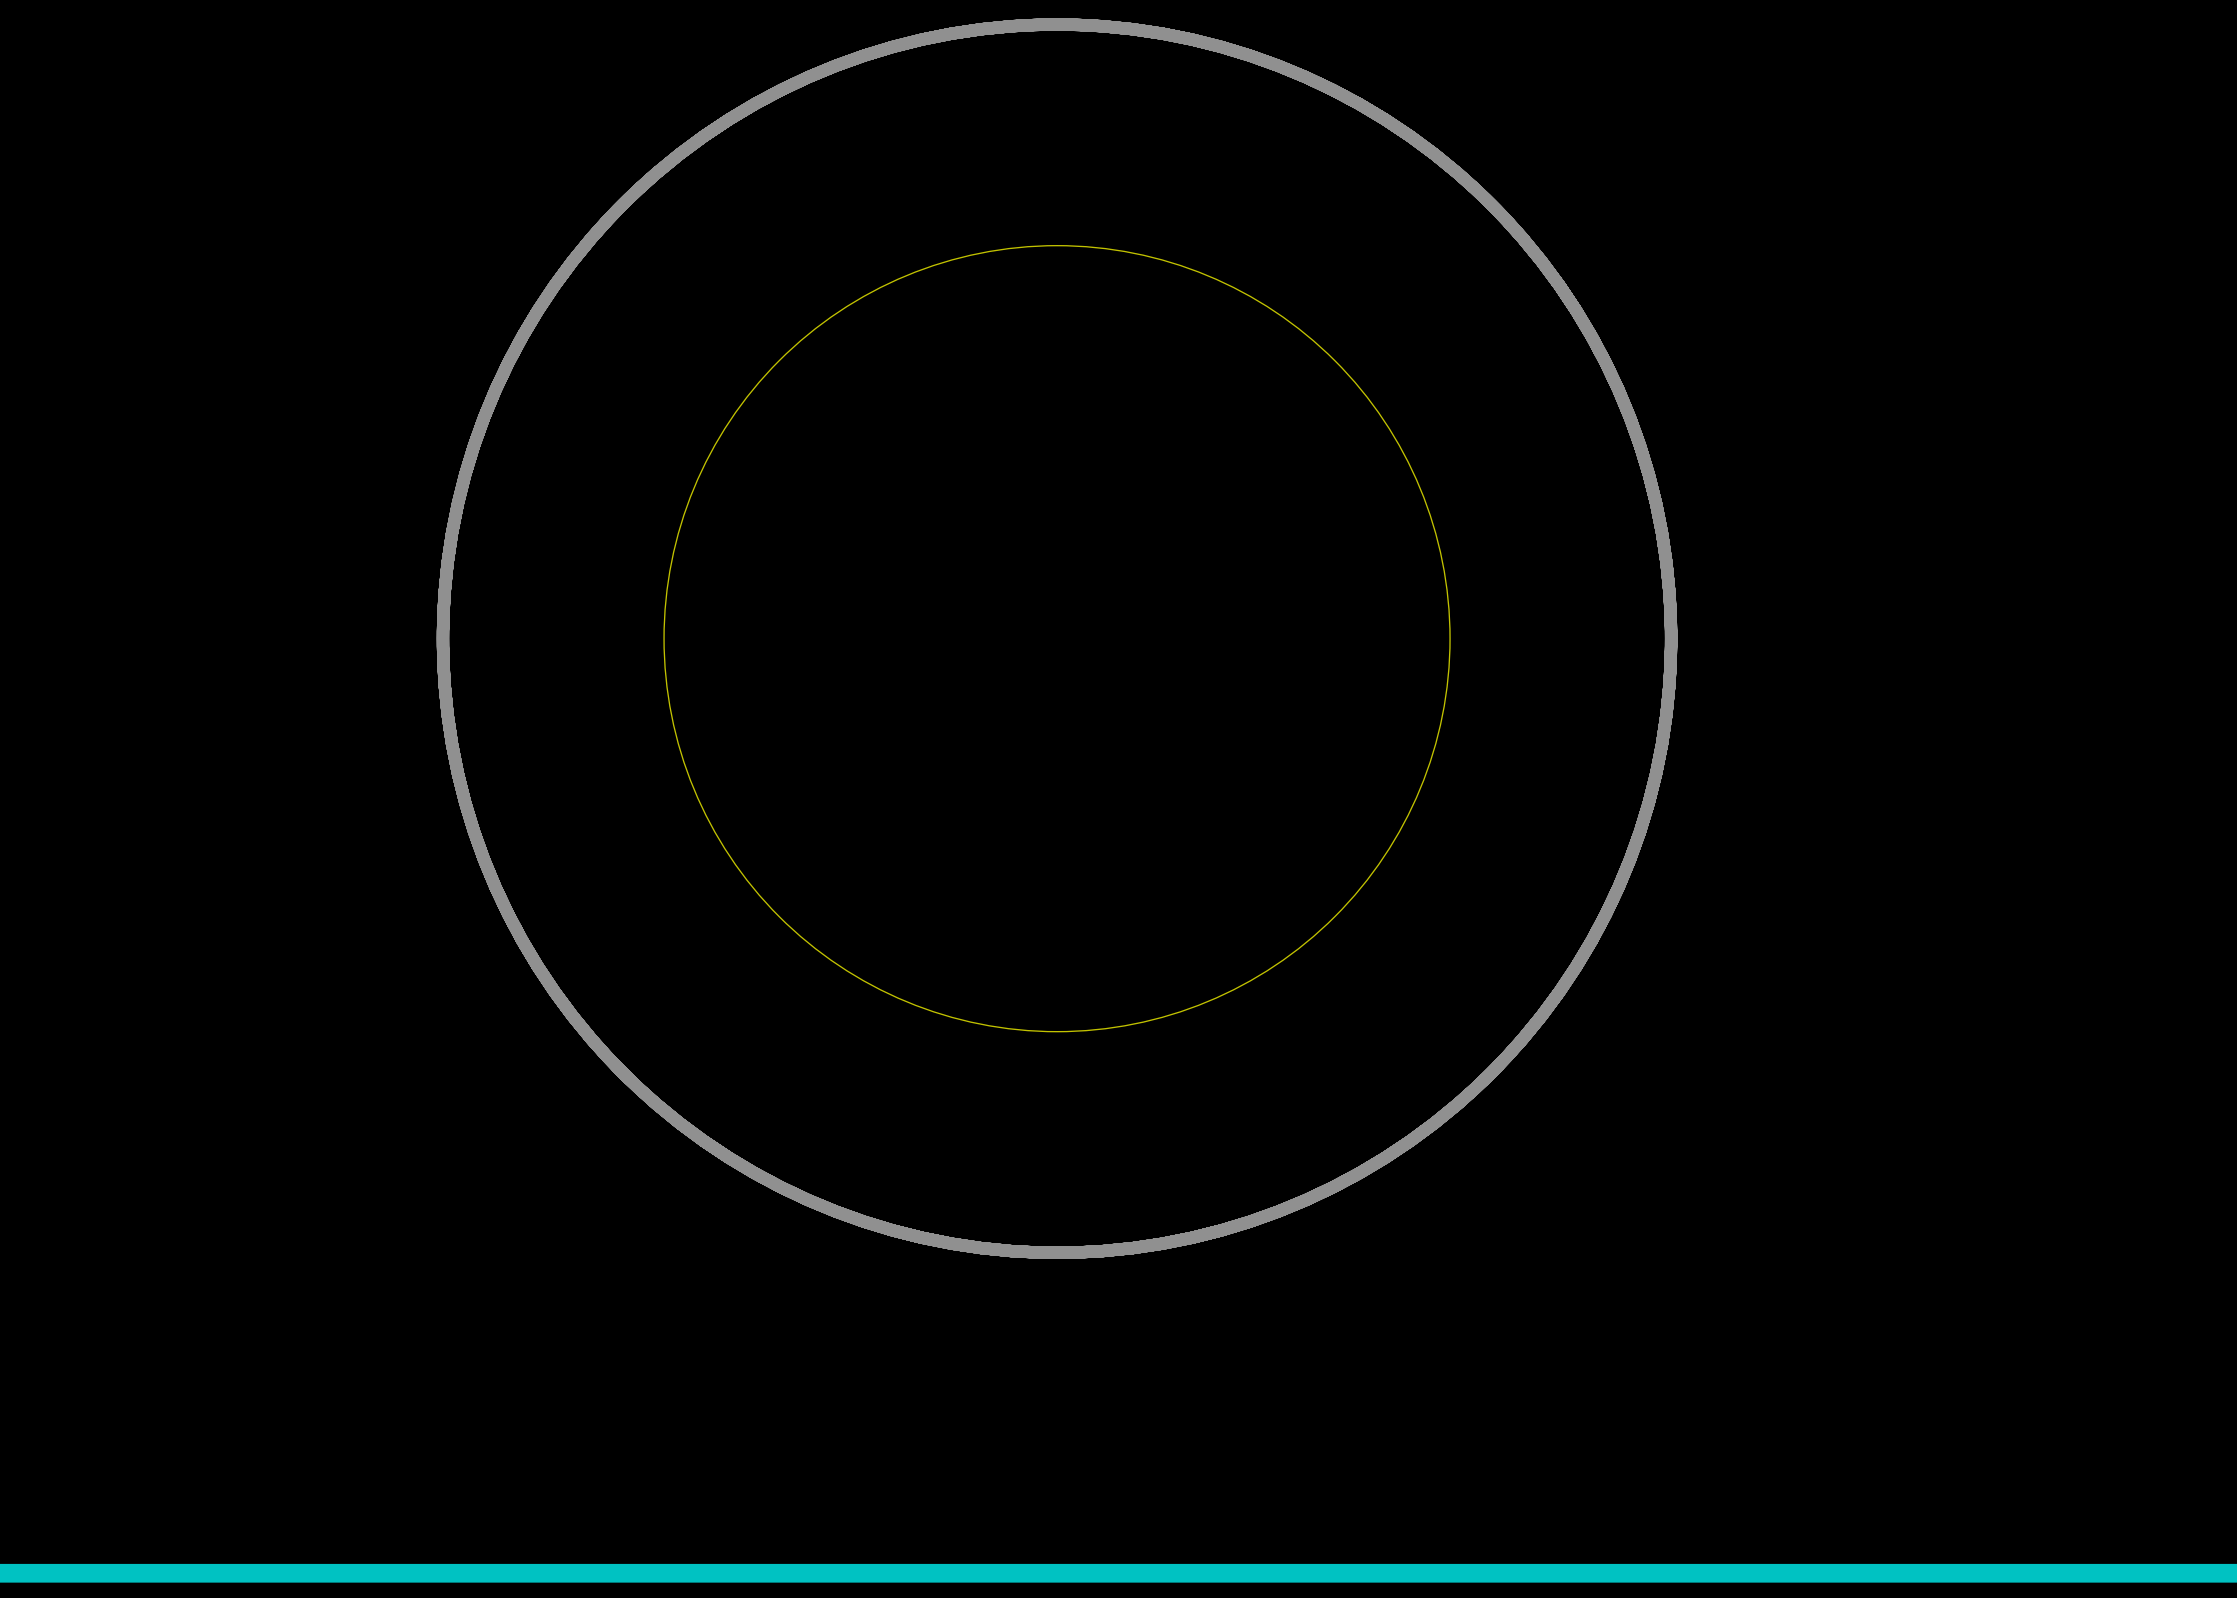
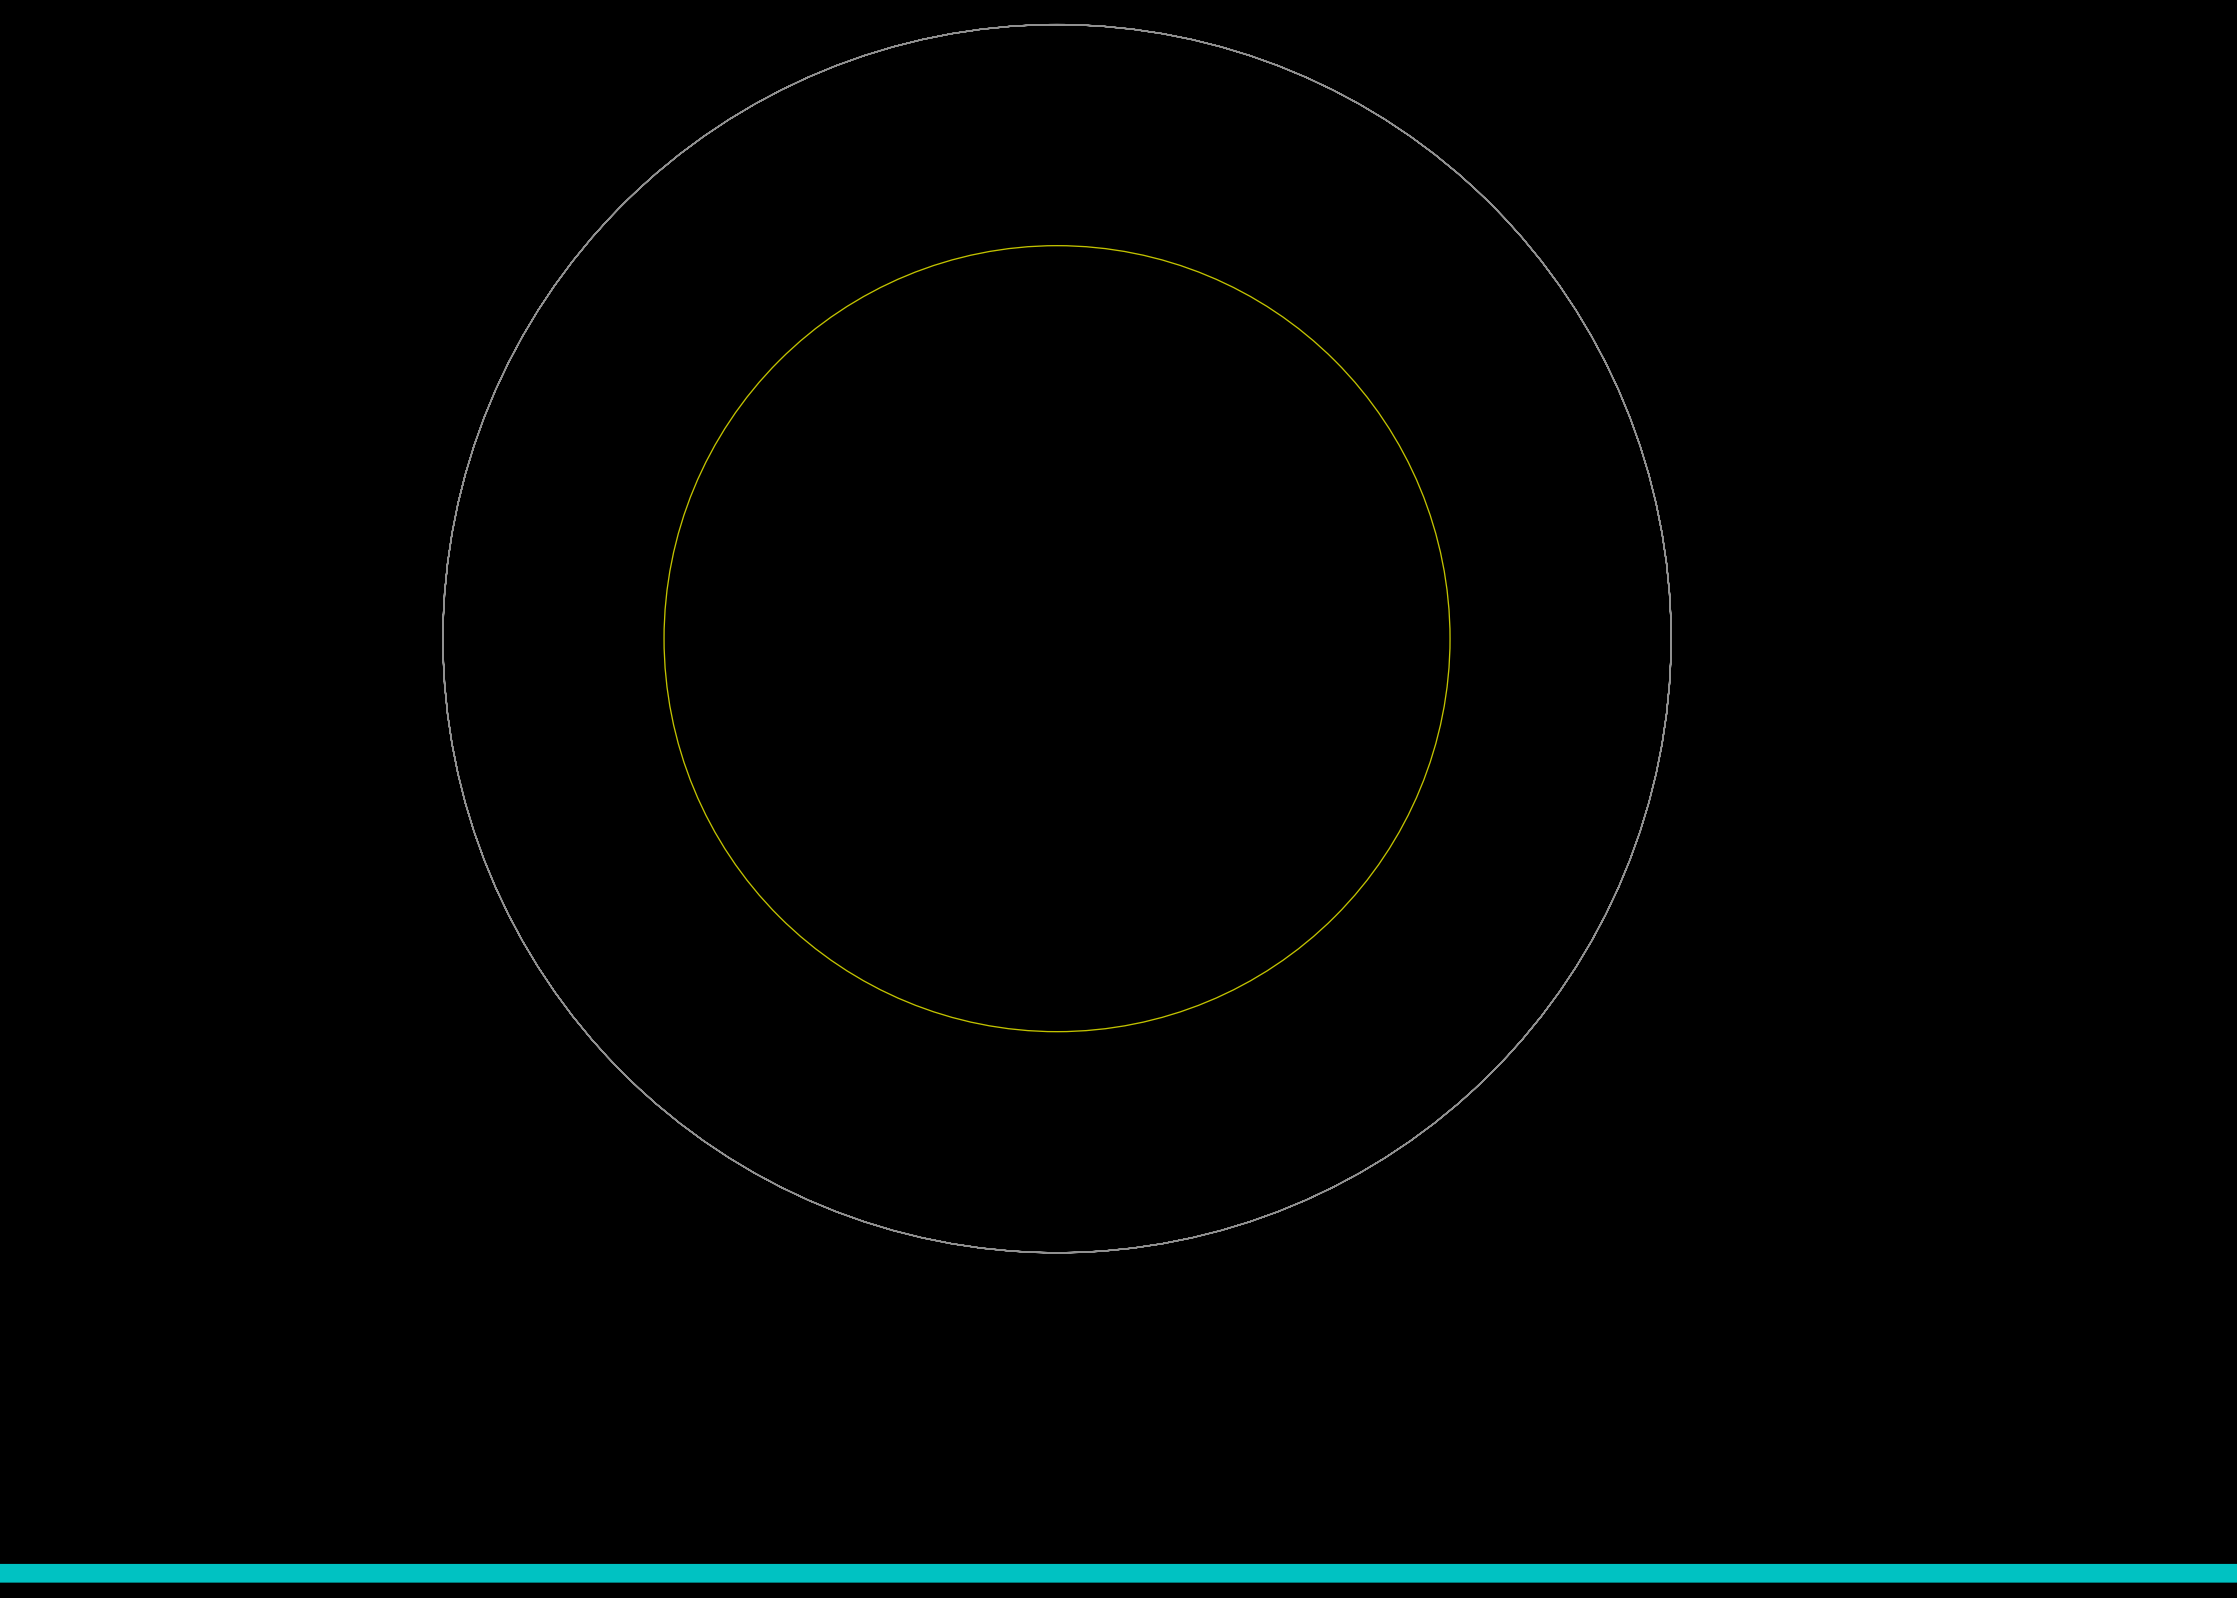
drawing shape: [436, 18, 1678, 1259] -> [442, 24, 1672, 1253]

